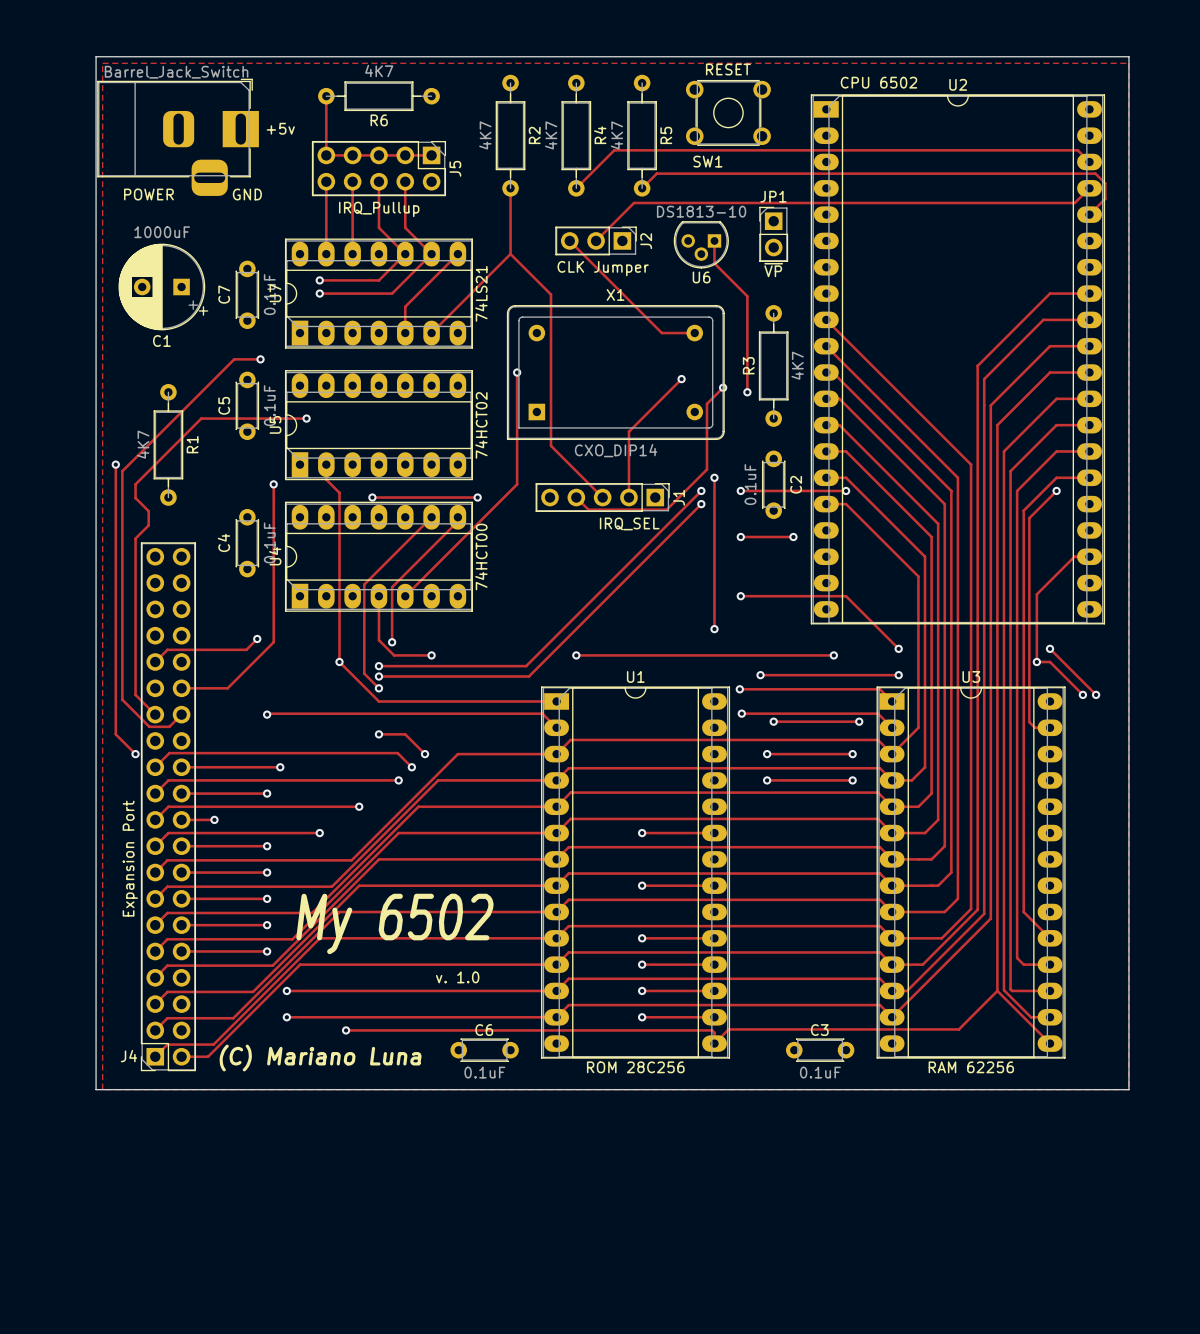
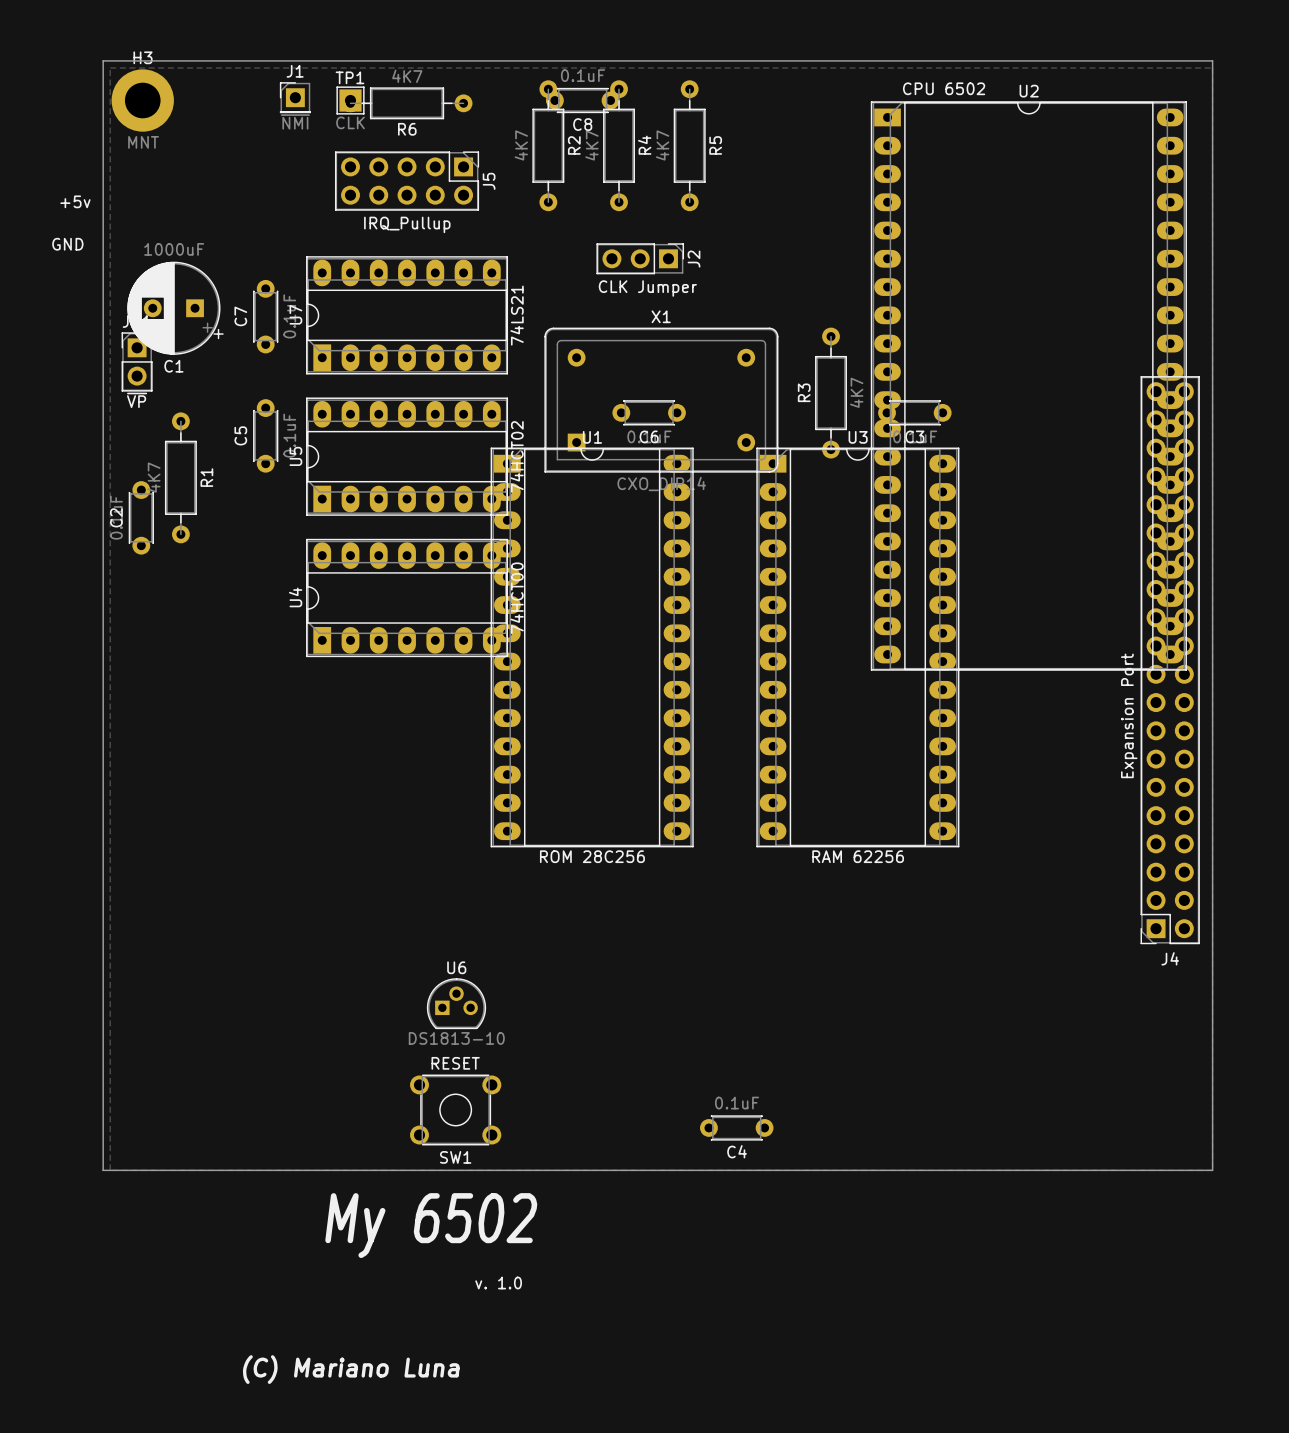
H3: none -> MNT (142, 100)
TP1: none -> CLK (350, 100)
C8: none -> 0.1uF (582, 100)
track: (326, 96) (326, 155) (431, 155) -> none
SW1 position: (728, 112) -> (455, 1109)
text position: +5v (280, 128) -> +5v (75, 201)
POWER: Barrel_Jack_Switch (178, 137) -> none
SW1 name position: SW1 (707, 161) -> SW1 (455, 1157)
track: (1089, 162) (1077, 150) (614, 150) (576, 188) -> none
track: (326, 181) (326, 254) -> none
track: (352, 181) (352, 254) -> none
track: (378, 181) (378, 227) (405, 254) (378, 280) (319, 280) -> none
track: (405, 181) (405, 227) (431, 254) (392, 293) (319, 293) -> none
track: (510, 188) (510, 254) -> none
track: (642, 188) (656, 173) (1095, 173) (1105, 183) (1105, 198) (1089, 214) -> none
track: (1089, 188) (1074, 202) (634, 202) (596, 240) -> none
text position: GND (247, 194) -> GND (67, 244)
JP1 position: (773, 234) -> (137, 361)
track: (569, 240) (661, 333) (694, 333) -> none
track: (714, 240) (714, 263) (747, 296) (747, 392) -> none
U6 rotation: 0° (701, 244) -> 180° (456, 1003)
U6 position: (701, 244) -> (456, 1003)
track: (457, 254) (405, 306) (405, 333) -> none
track: (510, 254) (431, 333) -> none
track: (510, 254) (551, 294) (551, 445) (602, 497) -> none
via: (319, 280) -> none
via: (319, 293) -> none
track: (1089, 293) (1050, 293) (977, 365) (977, 909) (922, 964) (892, 964) (879, 952) (568, 952) (556, 964) (300, 964) (208, 1056) (181, 1056) -> none
track: (826, 319) (971, 464) (971, 909) (941, 938) (892, 938) (879, 926) (568, 926) (556, 938) (319, 938) (213, 1044) (167, 1044) (155, 1056) -> none
track: (1089, 319) (1043, 319) (984, 379) (984, 913) (907, 990) (892, 990) (879, 978) (568, 978) (556, 990) (286, 990) -> none
track: (826, 346) (957, 477) (957, 898) (944, 912) (892, 912) (879, 899) (568, 899) (556, 912) (339, 912) (233, 1018) (167, 1018) (155, 1030) -> none
track: (1089, 346) (1050, 346) (990, 405) (990, 918) (892, 1017) (879, 1005) (568, 1005) (556, 1017) (286, 1017) -> none
track: (260, 359) (234, 359) (122, 471) (122, 699) (149, 726) (169, 726) (181, 714) -> none
via: (260, 359) -> none
track: (517, 372) (517, 484) (405, 596) -> none
via: (517, 372) -> none
track: (826, 372) (832, 372) (951, 490) (951, 872) (938, 885) (892, 885) (879, 873) (568, 873) (556, 885) (359, 885) (253, 991) (167, 991) (155, 1004) -> none
track: (1089, 372) (1050, 372) (997, 425) (997, 990) -> none
track: (681, 379) (628, 431) (628, 497) -> none
via: (681, 379) -> none
track: (723, 387) (706, 403) (706, 469) (666, 509) (588, 509) (576, 497) -> none
via: (723, 387) -> none
via: (747, 392) -> none
track: (826, 398) (839, 398) (944, 504) (944, 846) (931, 859) (892, 859) (879, 847) (568, 847) (556, 859) (379, 859) (272, 965) (167, 965) (155, 977) -> none
track: (1089, 398) (1056, 398) (1003, 451) (1003, 990) (1031, 1017) (1050, 1017) -> none
track: (306, 418) (201, 418) (135, 484) (135, 498) (148, 511) (148, 525) (135, 538) (135, 694) (155, 714) -> none
via: (306, 418) -> none
track: (826, 425) (839, 425) (938, 523) (938, 819) (925, 833) (892, 833) (877, 818) (570, 818) (556, 833) (398, 833) (292, 939) (167, 939) (155, 951) -> none
track: (1089, 425) (1056, 425) (1010, 471) (1010, 989) (1050, 990) -> none
track: (826, 451) (846, 451) (931, 537) (931, 793) (918, 806) (892, 806) (877, 792) (570, 792) (556, 806) (418, 806) (312, 912) (167, 912) (155, 925) -> none
track: (1089, 451) (1056, 451) (1017, 490) (1017, 958) (1023, 964) (1050, 964) -> none
track: (115, 464) (115, 734) (135, 754) -> none
via: (115, 464) -> none
track: (326, 464) (326, 479) (339, 492) (339, 662) (378, 701) (556, 701) -> none
track: (714, 477) (714, 629) -> none
via: (714, 477) -> none
track: (826, 477) (846, 477) (925, 556) (925, 767) (911, 780) (892, 780) (879, 768) (568, 768) (556, 780) (438, 780) (331, 886) (167, 886) (155, 898) -> none
track: (1089, 477) (1056, 477) (1023, 510) (1023, 912) (1050, 938) -> none
J1 footprint: [535, 483, 670, 512] -> [279, 82, 311, 114]
track: (273, 484) (273, 642) (227, 688) (181, 688) -> none
via: (273, 484) -> none
C2 position: (773, 484) -> (141, 517)
C2 name position: C2 (796, 484) -> C2 (116, 517)
track: (701, 490) (526, 666) (378, 666) -> none
via: (701, 490) -> none
track: (740, 490) (846, 490) -> none
via: (740, 490) -> none
via: (846, 490) -> none
track: (1056, 490) (1029, 518) (1029, 722) (1035, 727) (1050, 727) -> none
via: (1056, 490) -> none
track: (372, 497) (477, 497) -> none
via: (372, 497) -> none
via: (477, 497) -> none
J1 name position: J1 (679, 497) -> J1 (295, 71)
track: (701, 504) (528, 676) (378, 676) -> none
via: (701, 504) -> none
track: (826, 504) (846, 504) (918, 576) (918, 727) (892, 754) (877, 739) (570, 739) (556, 754) (457, 754) (351, 860) (167, 860) (155, 872) -> none
track: (431, 517) (364, 584) (364, 673) (378, 688) -> none
track: (457, 517) (457, 521) (392, 587) (392, 642) -> none
J1 value: IRQ_SEL (629, 523) -> ~{NMI} (295, 121)
track: (740, 537) (793, 537) -> none
via: (740, 537) -> none
via: (793, 537) -> none
C4 name position: C4 (223, 542) -> C4 (737, 1151)
C4 value position: 0.1uF (269, 542) -> 0.1uF (737, 1103)
C4 rotation: 0° (247, 543) -> 90° clockwise (736, 1127)
C4 position: (247, 543) -> (736, 1127)
track: (1089, 556) (1074, 556) (1036, 594) (1036, 662) (1050, 662) (1082, 694) -> none
track: (372, 596) (378, 596) (378, 640) (394, 655) (431, 655) -> none
track: (740, 596) (846, 596) (898, 648) -> none
via: (740, 596) -> none
via: (714, 629) -> none
track: (257, 638) (246, 649) (167, 649) (155, 662) -> none
via: (257, 638) -> none
via: (392, 642) -> none
via: (898, 648) -> none
track: (1050, 648) (1096, 694) -> none
via: (1050, 648) -> none
via: (431, 655) -> none
track: (576, 655) (833, 655) -> none
via: (576, 655) -> none
via: (833, 655) -> none
via: (339, 662) -> none
via: (1036, 662) -> none
via: (378, 666) -> none
track: (760, 675) (898, 675) -> none
via: (760, 675) -> none
via: (898, 675) -> none
via: (378, 676) -> none
via: (378, 688) -> none
track: (739, 689) (879, 689) (892, 701) -> none
via: (739, 689) -> none
via: (1082, 694) -> none
via: (1096, 694) -> none
track: (741, 713) (877, 713) (892, 727) -> none
via: (741, 713) -> none
track: (267, 714) (542, 713) (556, 727) -> none
via: (267, 714) -> none
track: (773, 721) (859, 721) -> none
via: (773, 721) -> none
via: (859, 721) -> none
track: (378, 734) (405, 734) (425, 754) -> none
via: (378, 734) -> none
via: (135, 754) -> none
via: (425, 754) -> none
track: (767, 754) (852, 754) -> none
via: (767, 754) -> none
via: (852, 754) -> none
track: (155, 767) (169, 753) (397, 753) (411, 767) -> none
track: (181, 767) (280, 767) -> none
via: (280, 767) -> none
via: (411, 767) -> none
track: (398, 780) (168, 780) (155, 793) -> none
via: (398, 780) -> none
track: (767, 780) (852, 780) -> none
via: (767, 780) -> none
via: (852, 780) -> none
track: (181, 793) (267, 793) -> none
via: (267, 793) -> none
J4 position: (168, 806) -> (1170, 660)
track: (359, 806) (168, 806) (155, 819) -> none
via: (359, 806) -> none
track: (181, 819) (214, 819) -> none
via: (214, 819) -> none
track: (319, 833) (168, 833) (155, 846) -> none
via: (319, 833) -> none
track: (642, 833) (714, 833) -> none
via: (642, 833) -> none
track: (181, 846) (267, 846) -> none
via: (267, 846) -> none
track: (181, 872) (267, 872) -> none
via: (267, 872) -> none
U1 position: (635, 872) -> (592, 647)
U3 position: (971, 872) -> (857, 647)
track: (642, 885) (714, 885) -> none
via: (642, 885) -> none
track: (181, 898) (267, 898) -> none
via: (267, 898) -> none
text position: My 6502 (394, 923) -> My 6502 (431, 1225)
track: (181, 925) (267, 925) -> none
via: (267, 925) -> none
track: (642, 938) (714, 938) -> none
via: (642, 938) -> none
track: (181, 951) (267, 951) -> none
via: (267, 951) -> none
track: (642, 964) (714, 964) -> none
via: (642, 964) -> none
text position: v. 1.0 (457, 977) -> v. 1.0 (498, 1283)
via: (286, 990) -> none
track: (642, 990) (714, 990) -> none
via: (642, 990) -> none
track: (997, 990) (1050, 1043) -> none
track: (997, 990) (958, 1029) (728, 1029) (714, 1043) (714, 1032) (712, 1030) (346, 1030) -> none
via: (286, 1017) -> none
track: (642, 1017) (714, 1017) -> none
via: (642, 1017) -> none
via: (346, 1030) -> none
C6 name position: C6 (484, 1030) -> C6 (649, 436)
C3 name position: C3 (819, 1030) -> C3 (914, 436)
C6 position: (484, 1050) -> (649, 412)
C3 position: (820, 1050) -> (914, 412)
J4 name position: J4 (128, 1056) -> J4 (1170, 958)
text position: (C) Mariano Luna (320, 1058) -> (C) Mariano Luna (351, 1369)

